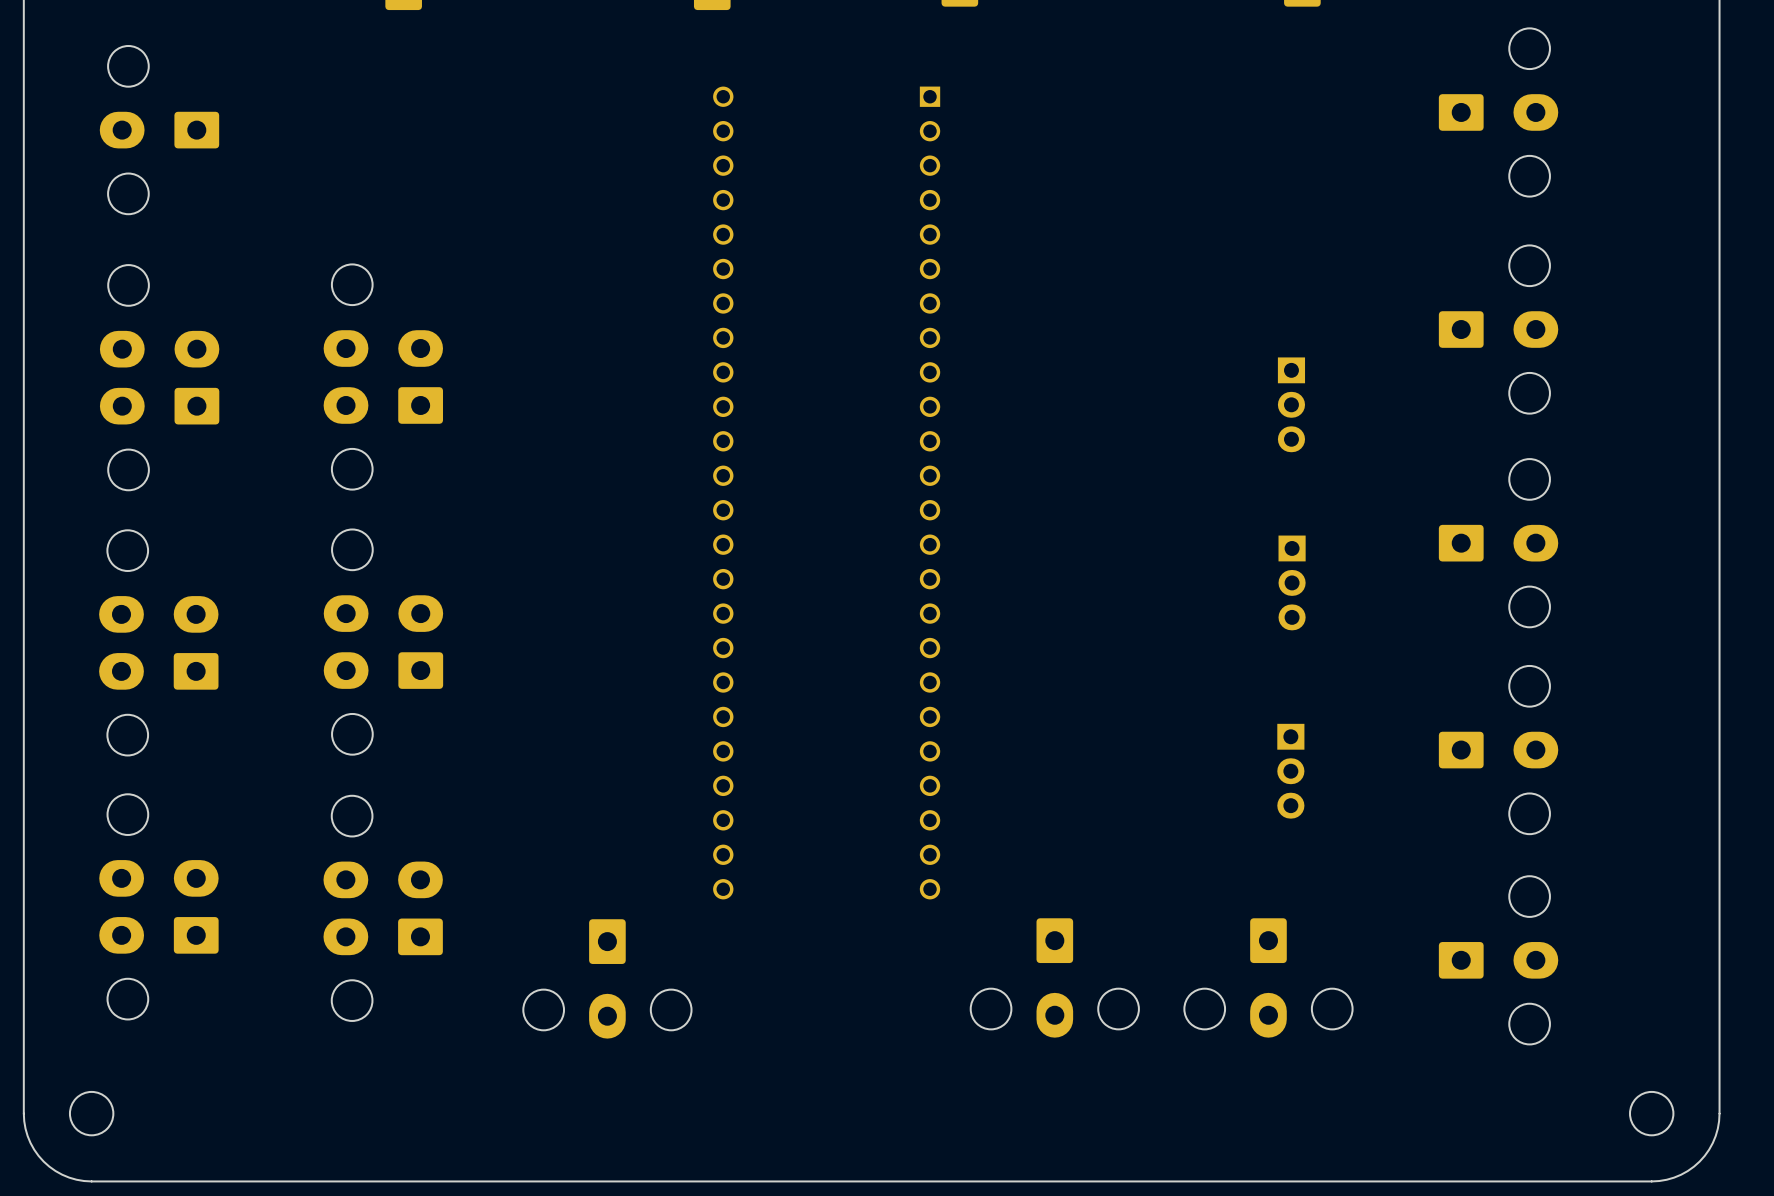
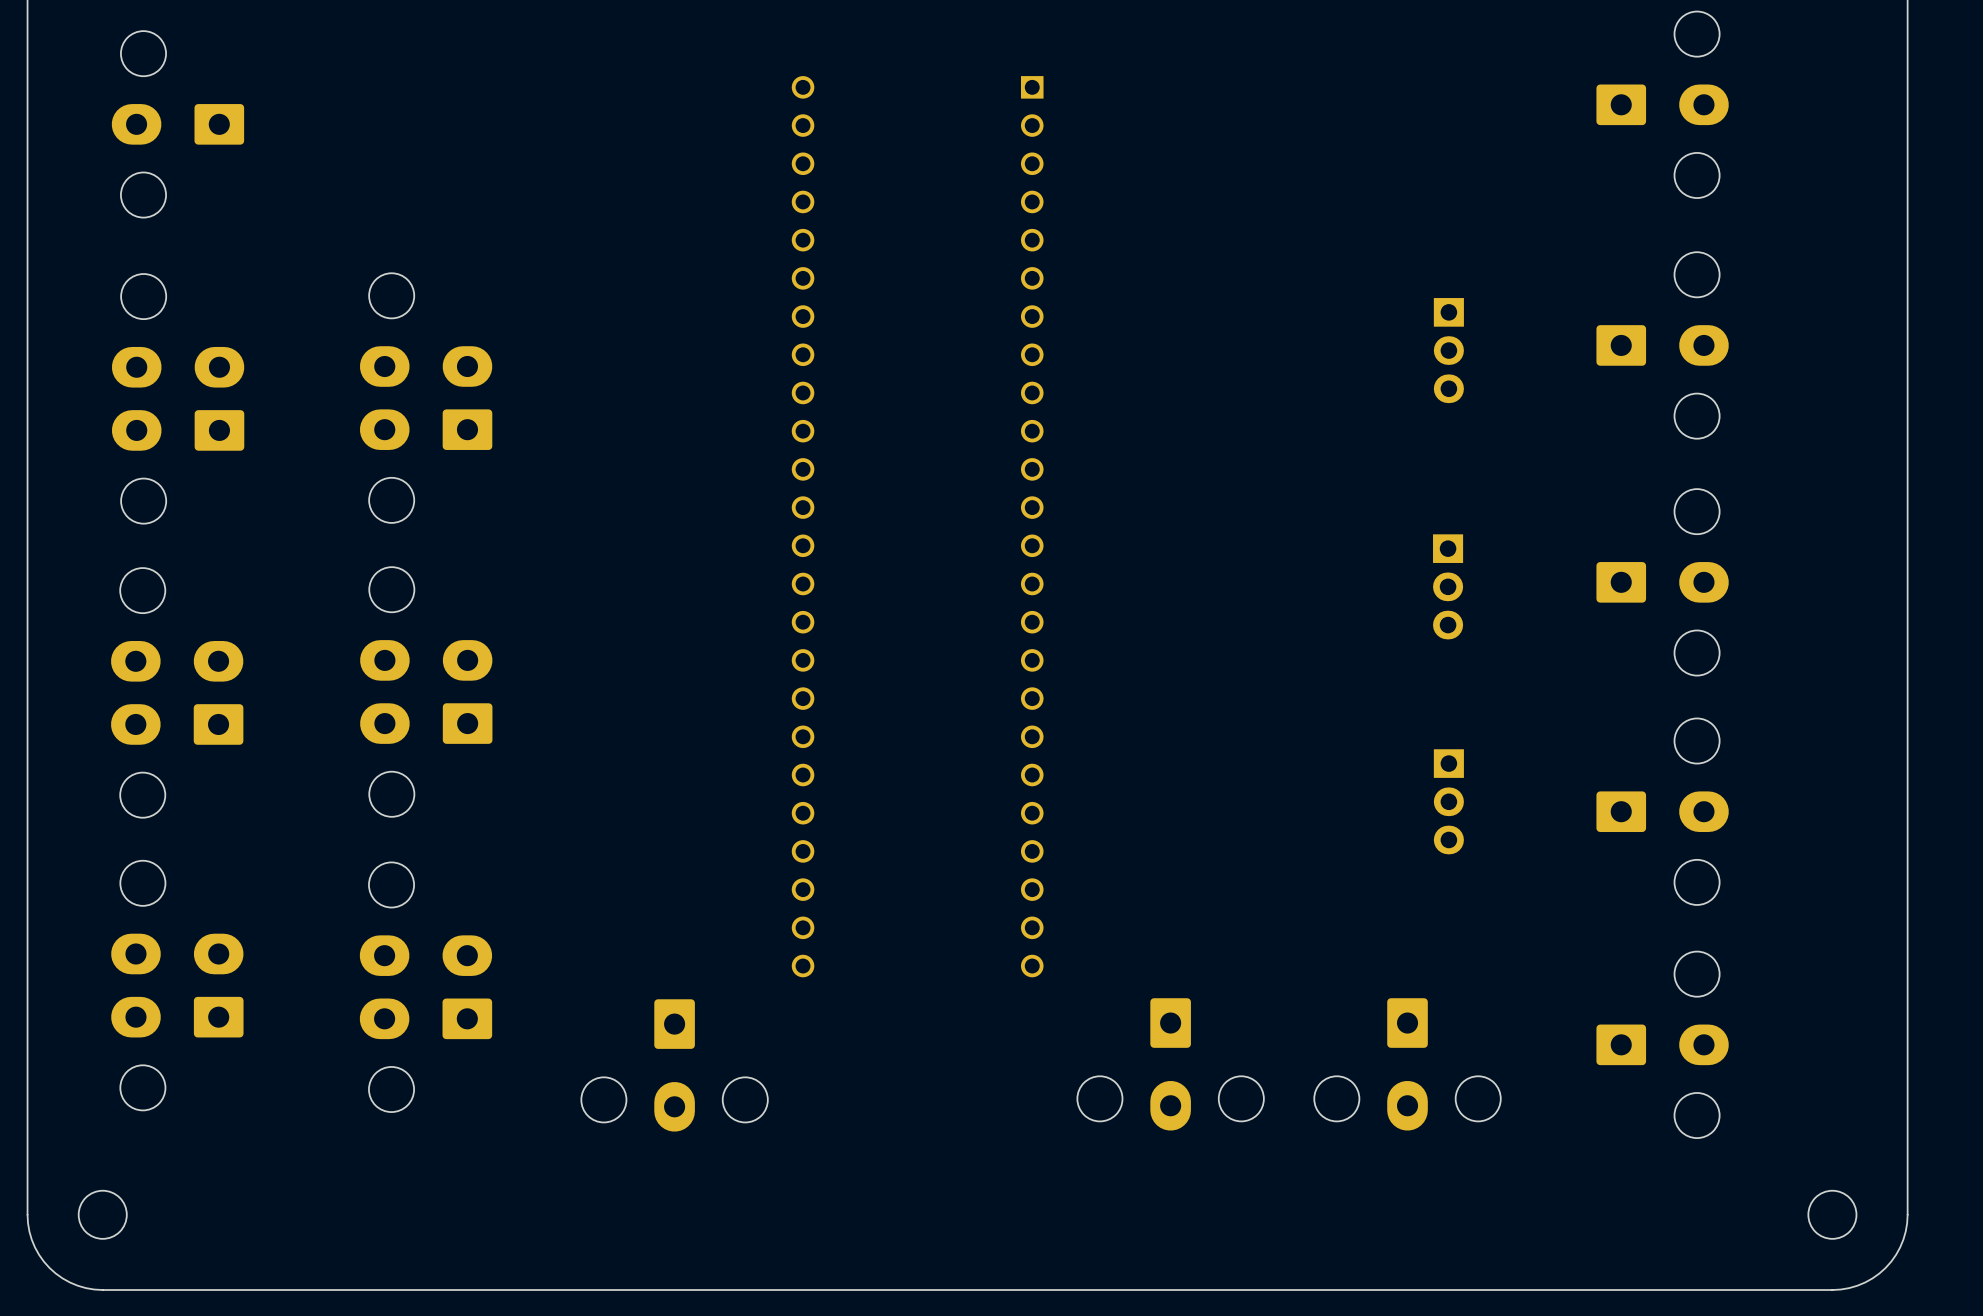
part: none -> (1448, 350)
part: (1291, 404) -> none
part position: (1292, 582) -> (1448, 586)
part position: (1290, 771) -> (1448, 801)

